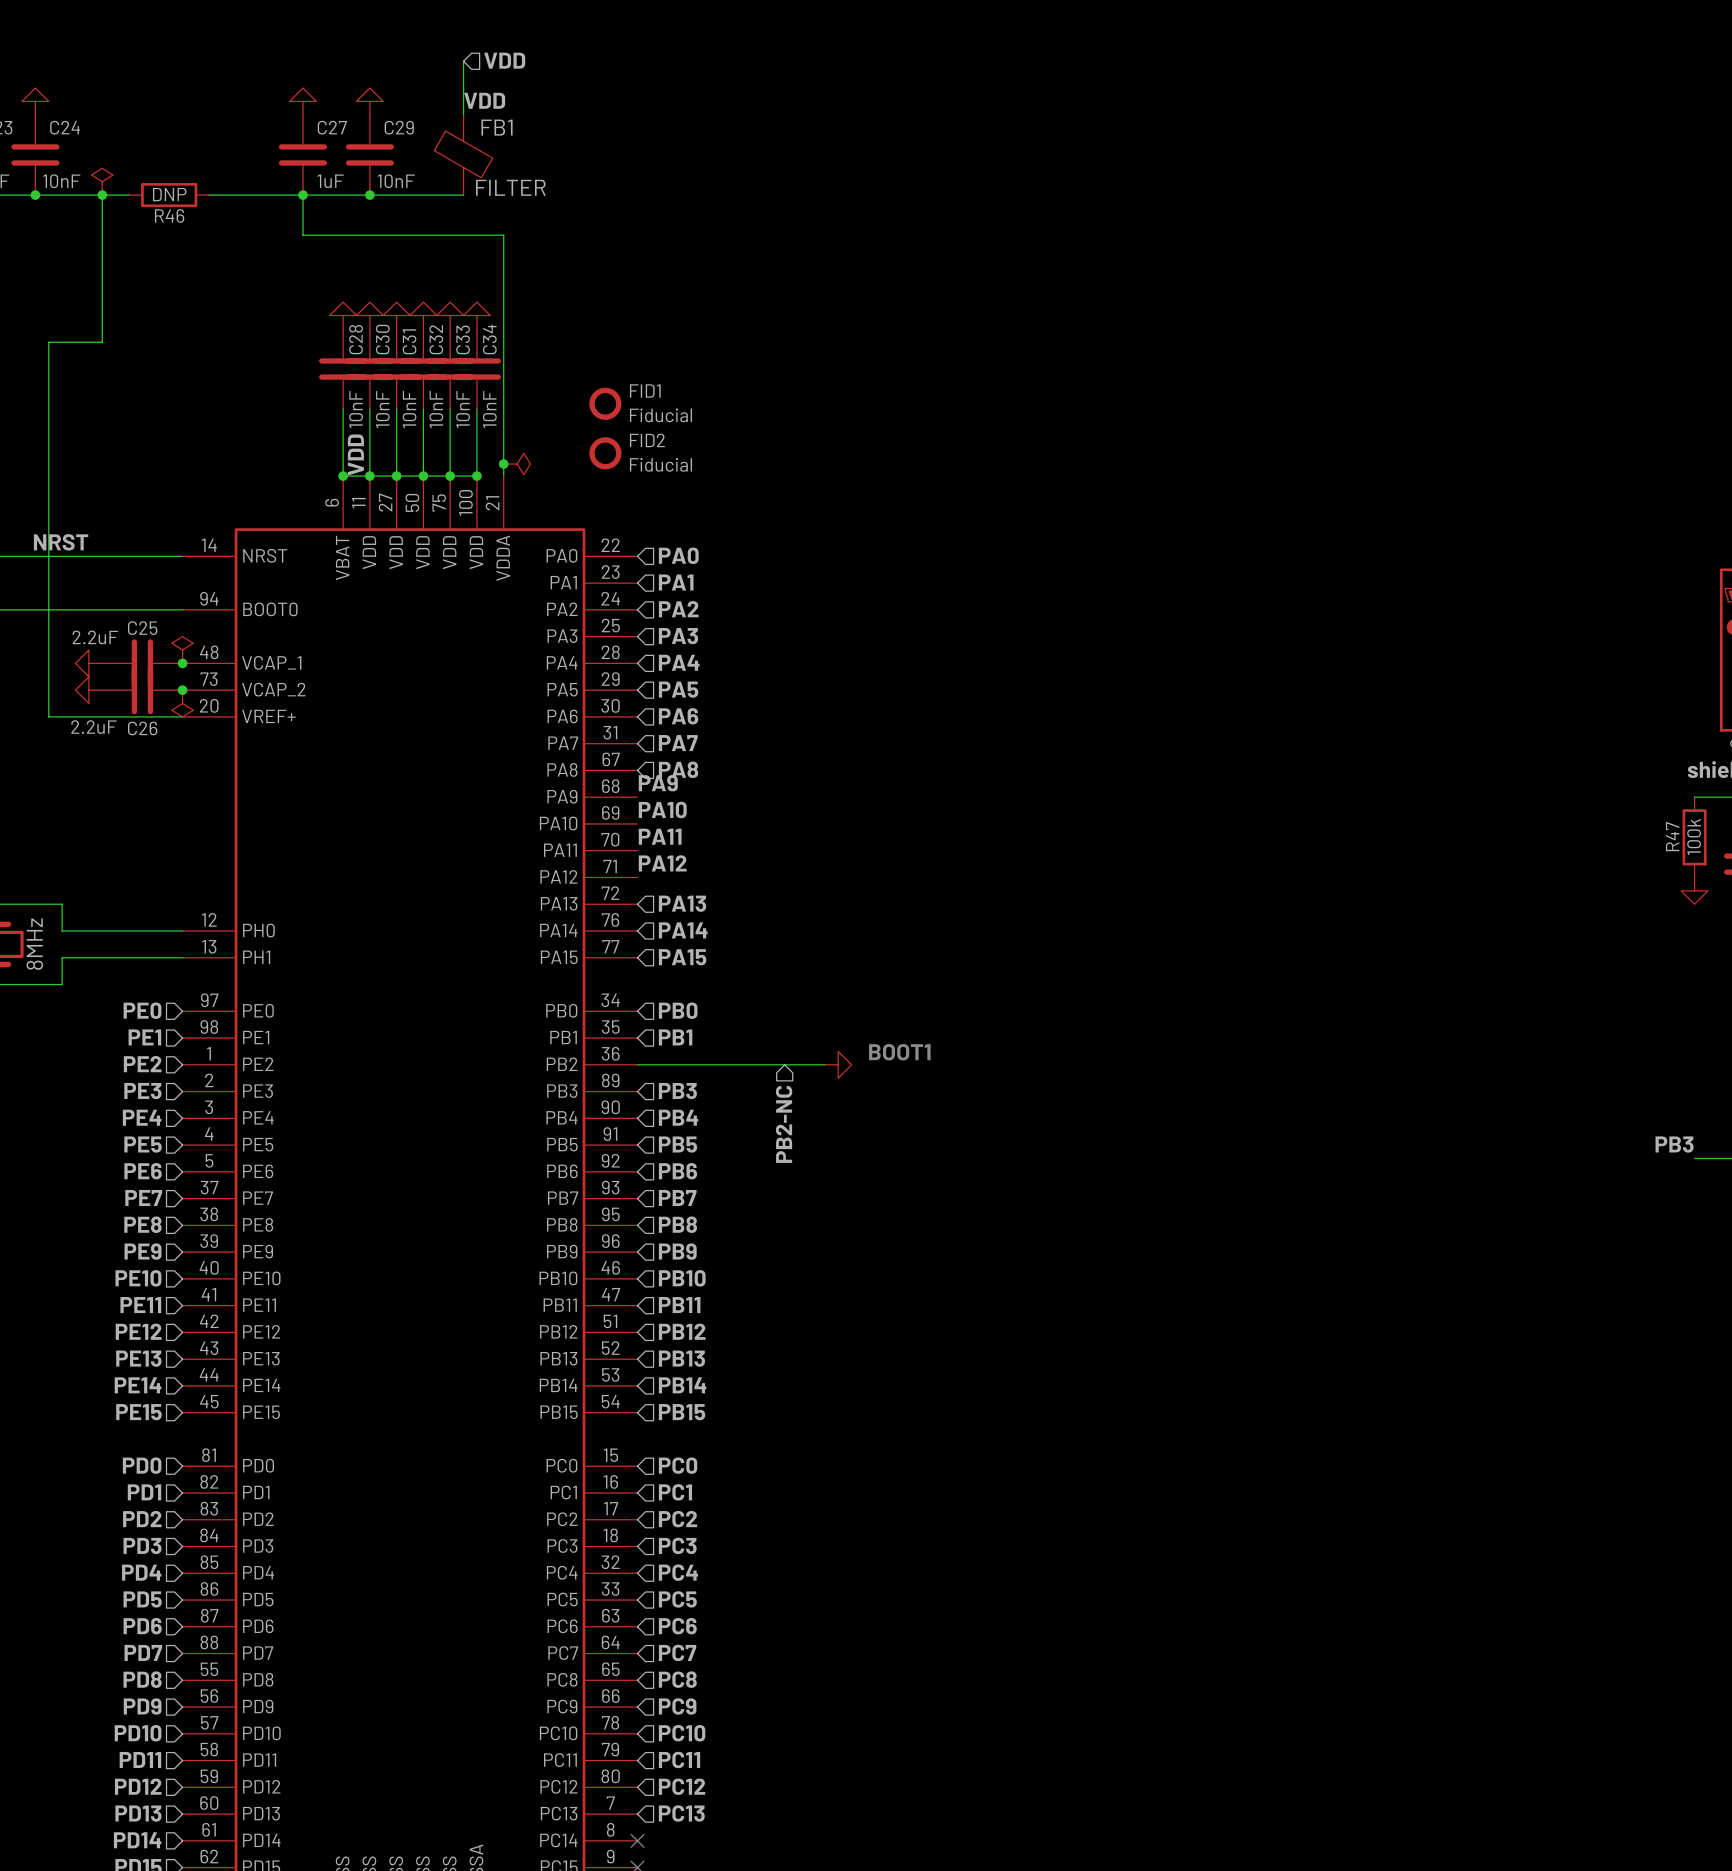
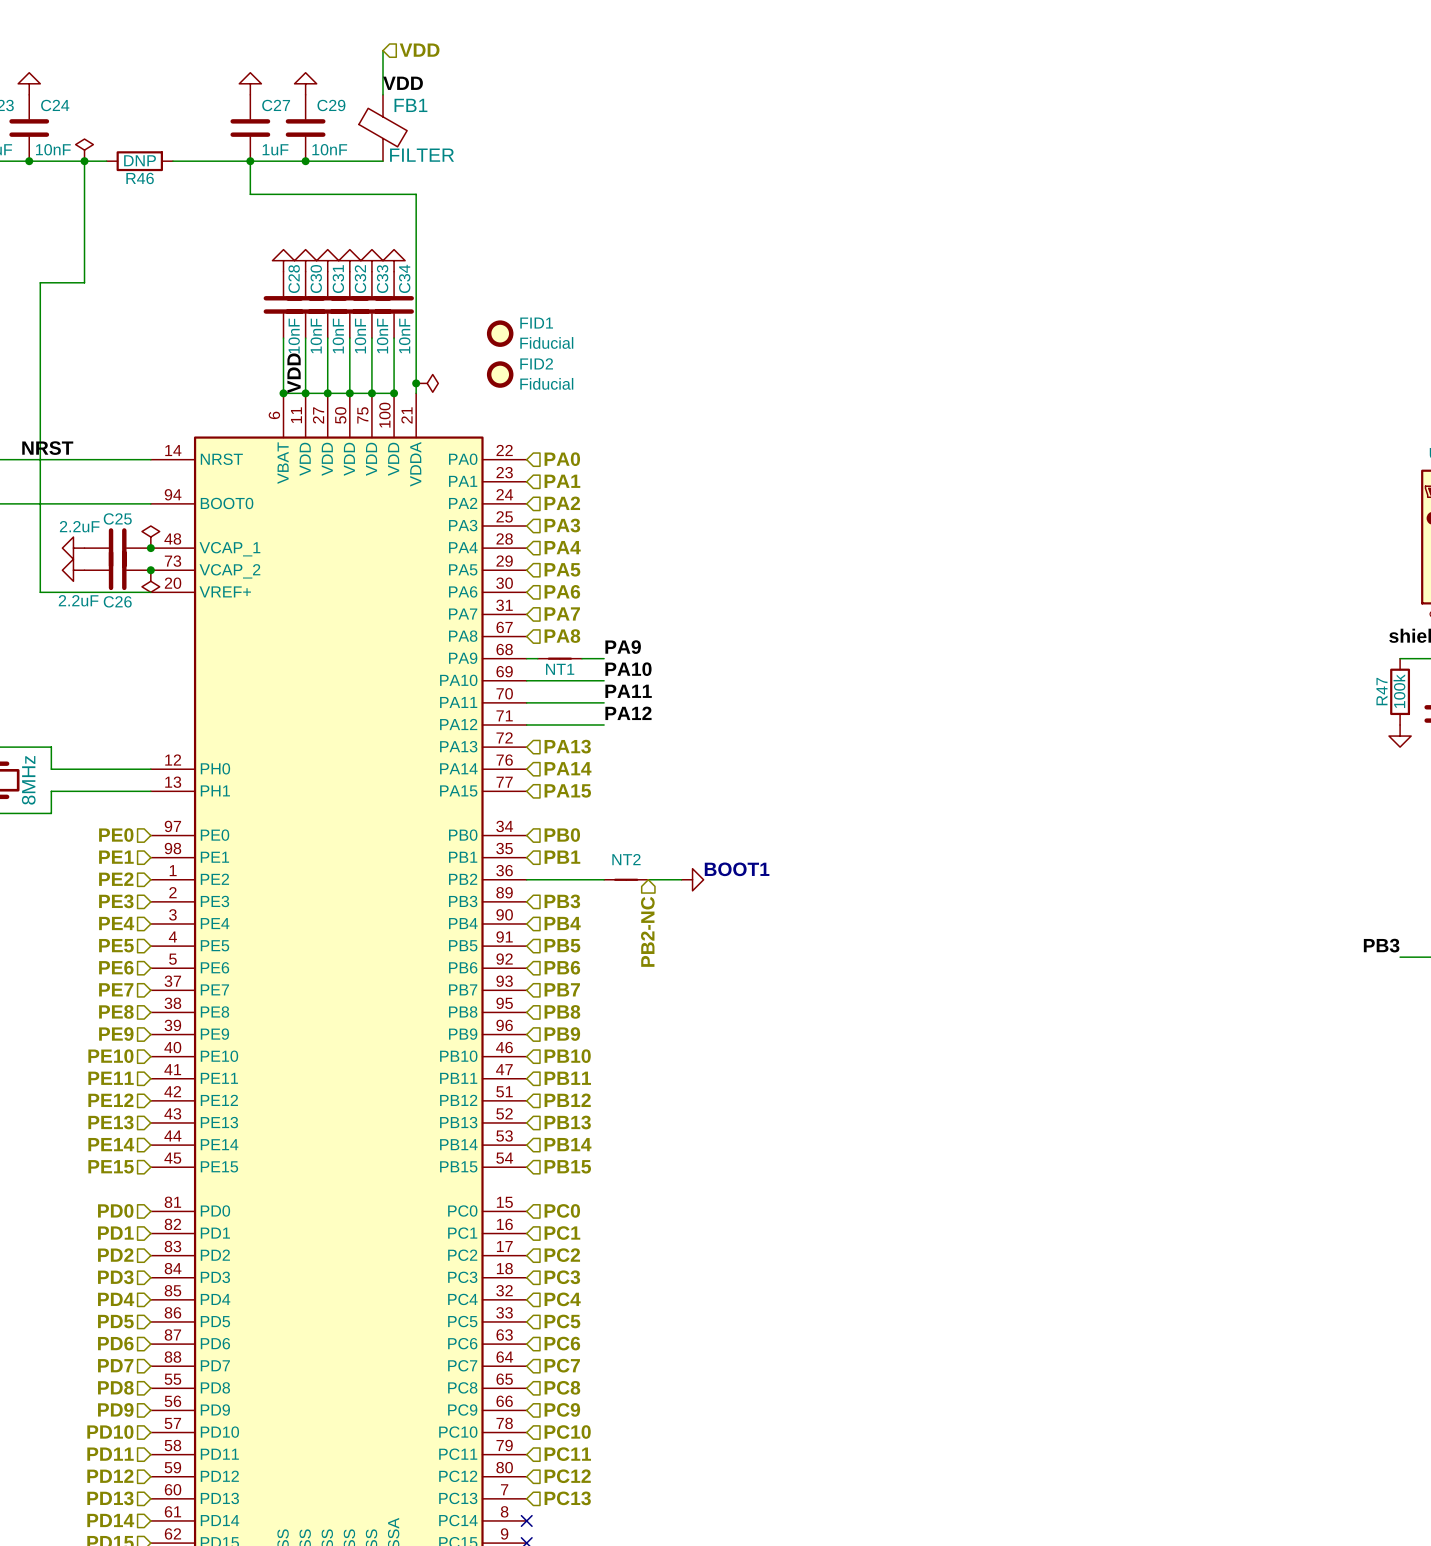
label position: PA9 (658, 783) -> PA9 (623, 647)
wire: none -> (526, 658) (537, 658)
NT1: none -> (559, 658)
wire: none -> (581, 658) (604, 658)
label position: PA10 (662, 809) -> PA10 (628, 669)
wire: none -> (526, 680) (604, 680)
label position: PA11 (660, 836) -> PA11 (628, 691)
wire: none -> (526, 702) (604, 702)
label position: PA12 (662, 863) -> PA12 (628, 713)
wire: none -> (526, 724) (604, 724)
NT2: none -> (626, 879)

